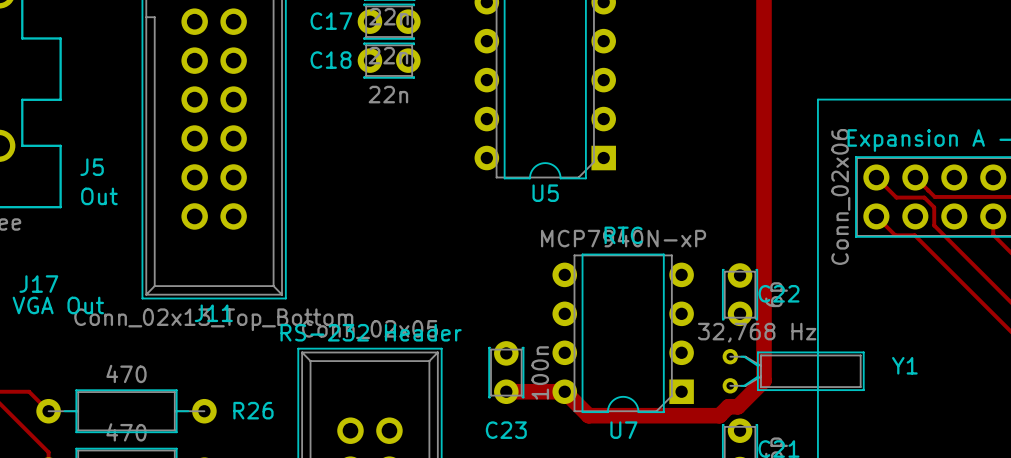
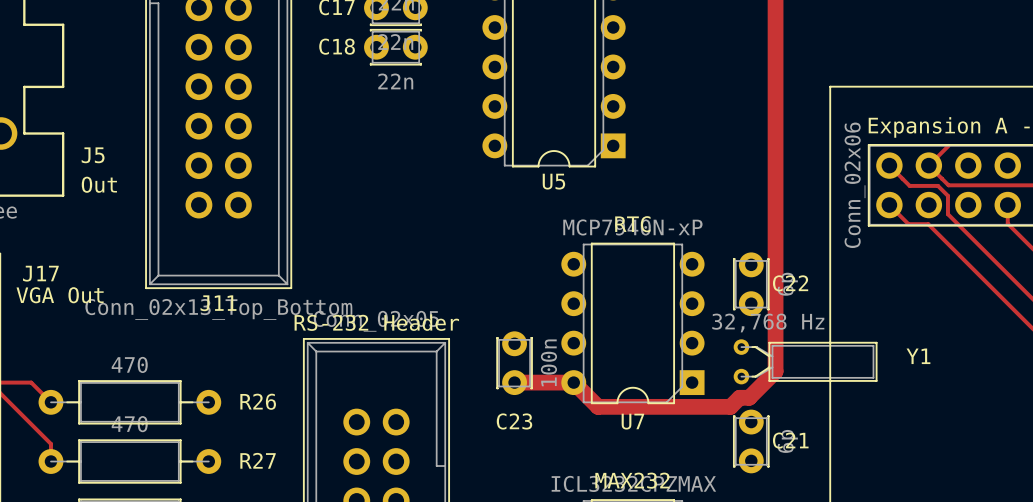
track: none -> (948, 145) (928, 165)

